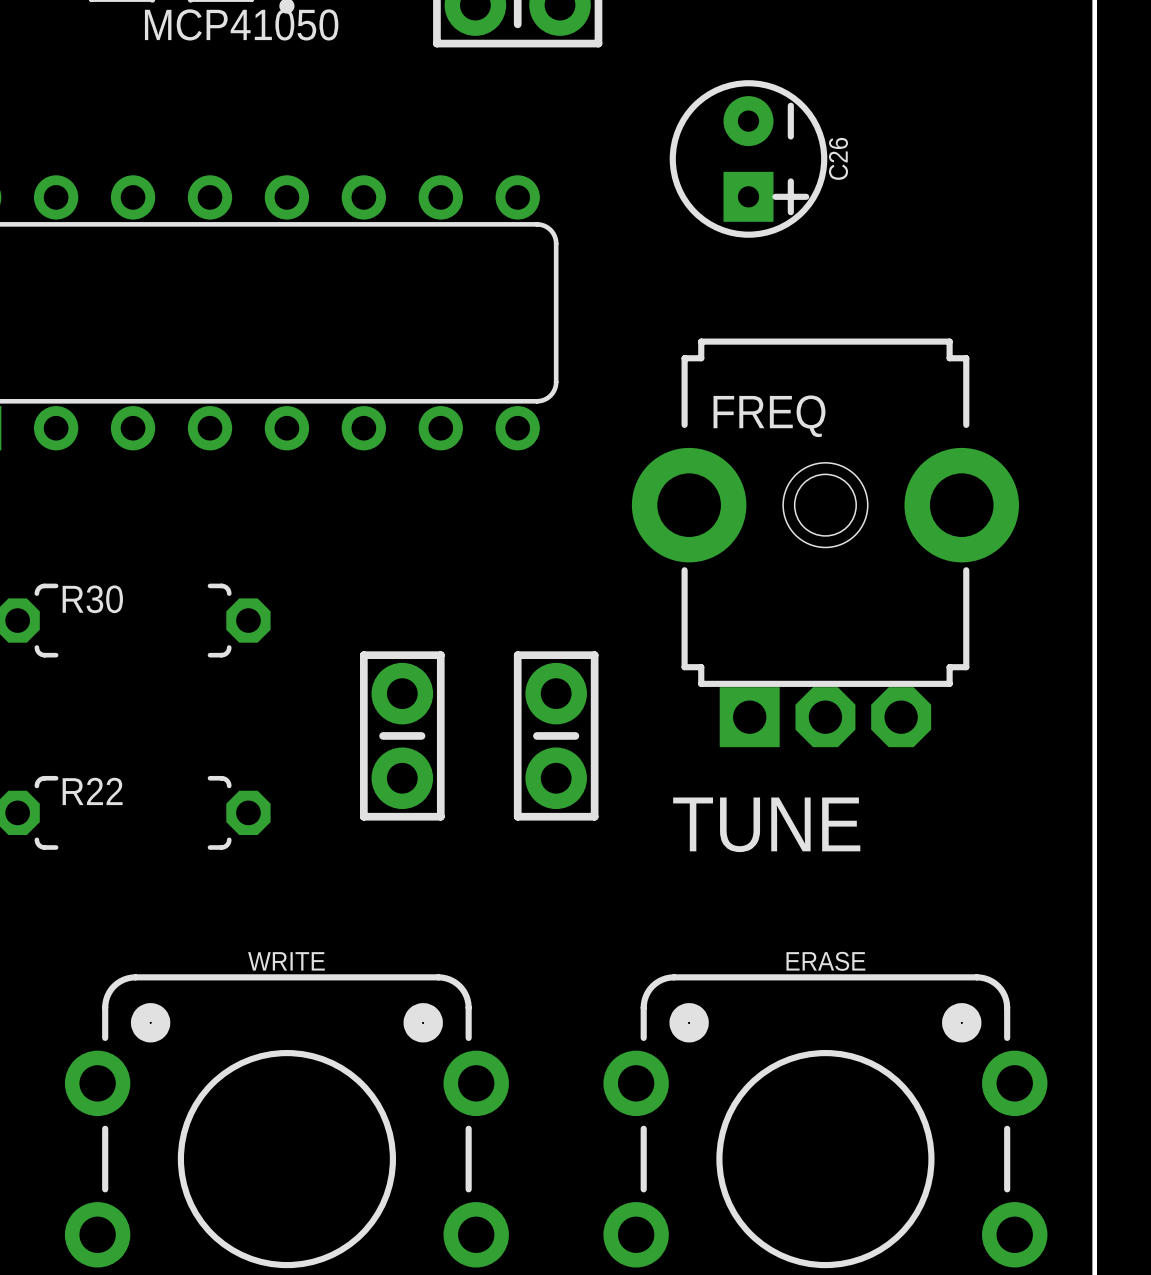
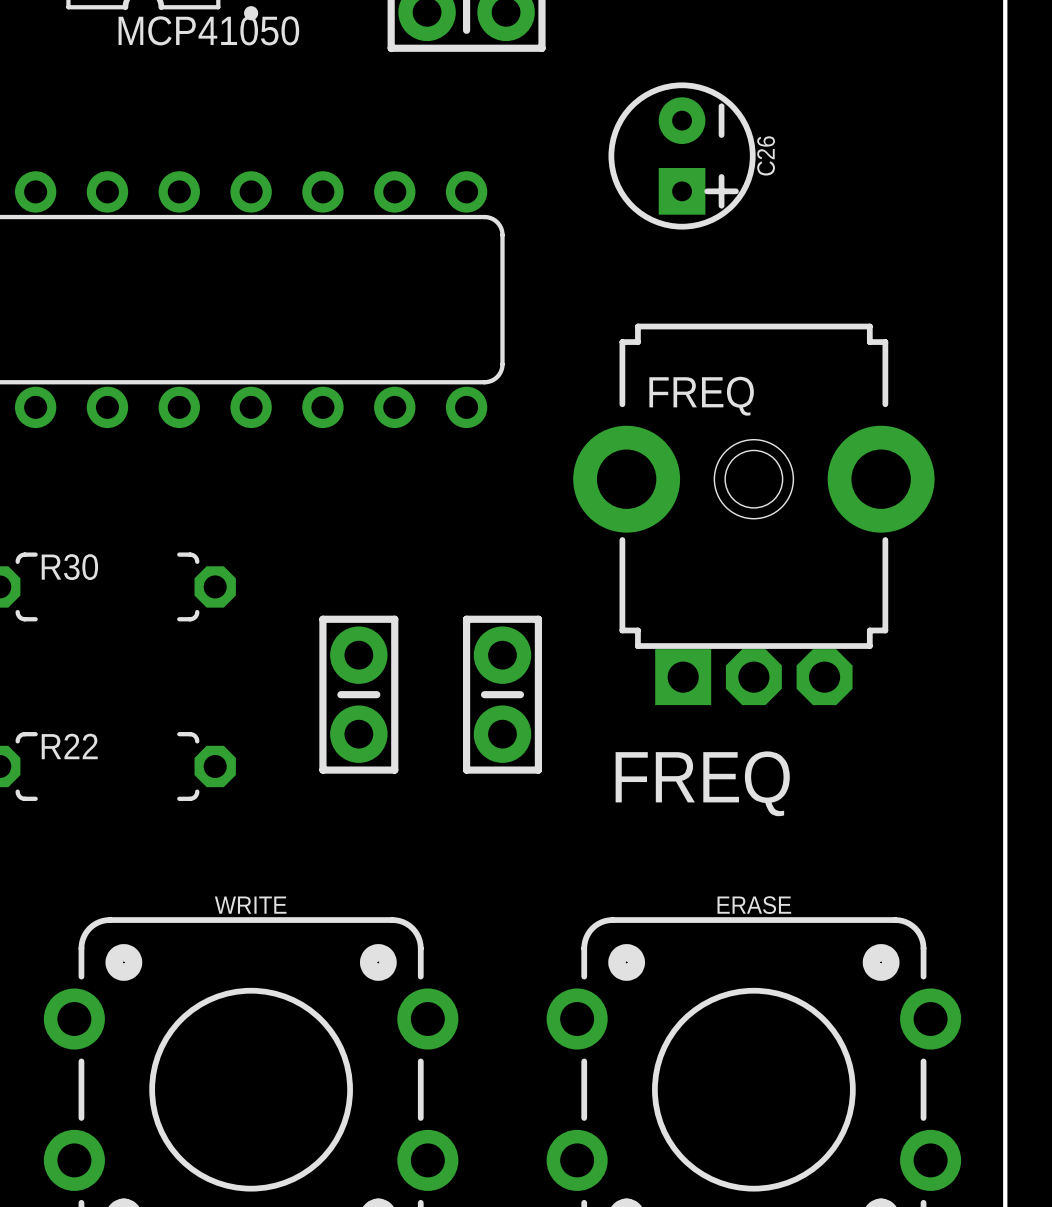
text: TUNE (766, 824) -> FREQ (702, 783)

